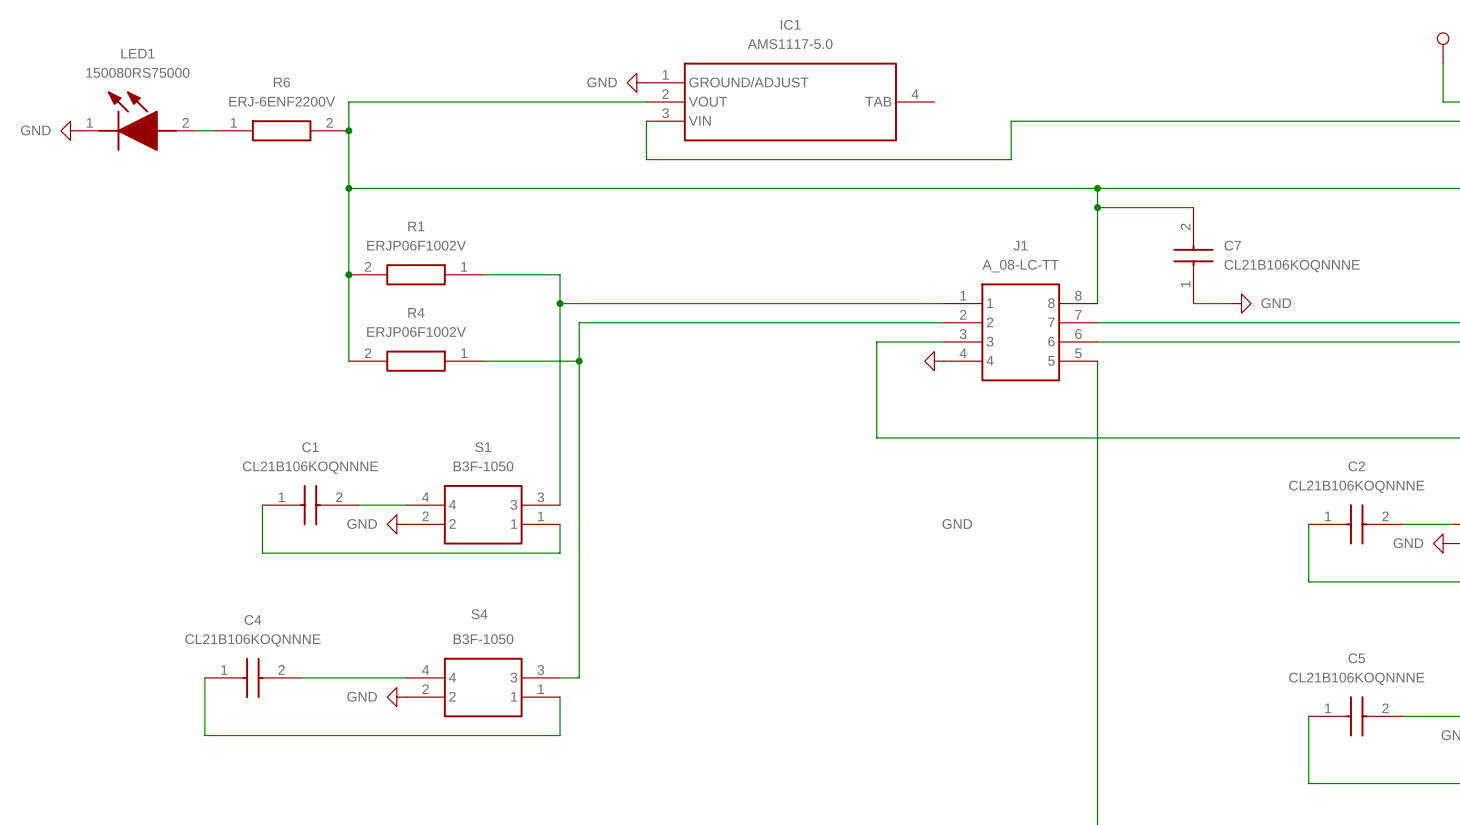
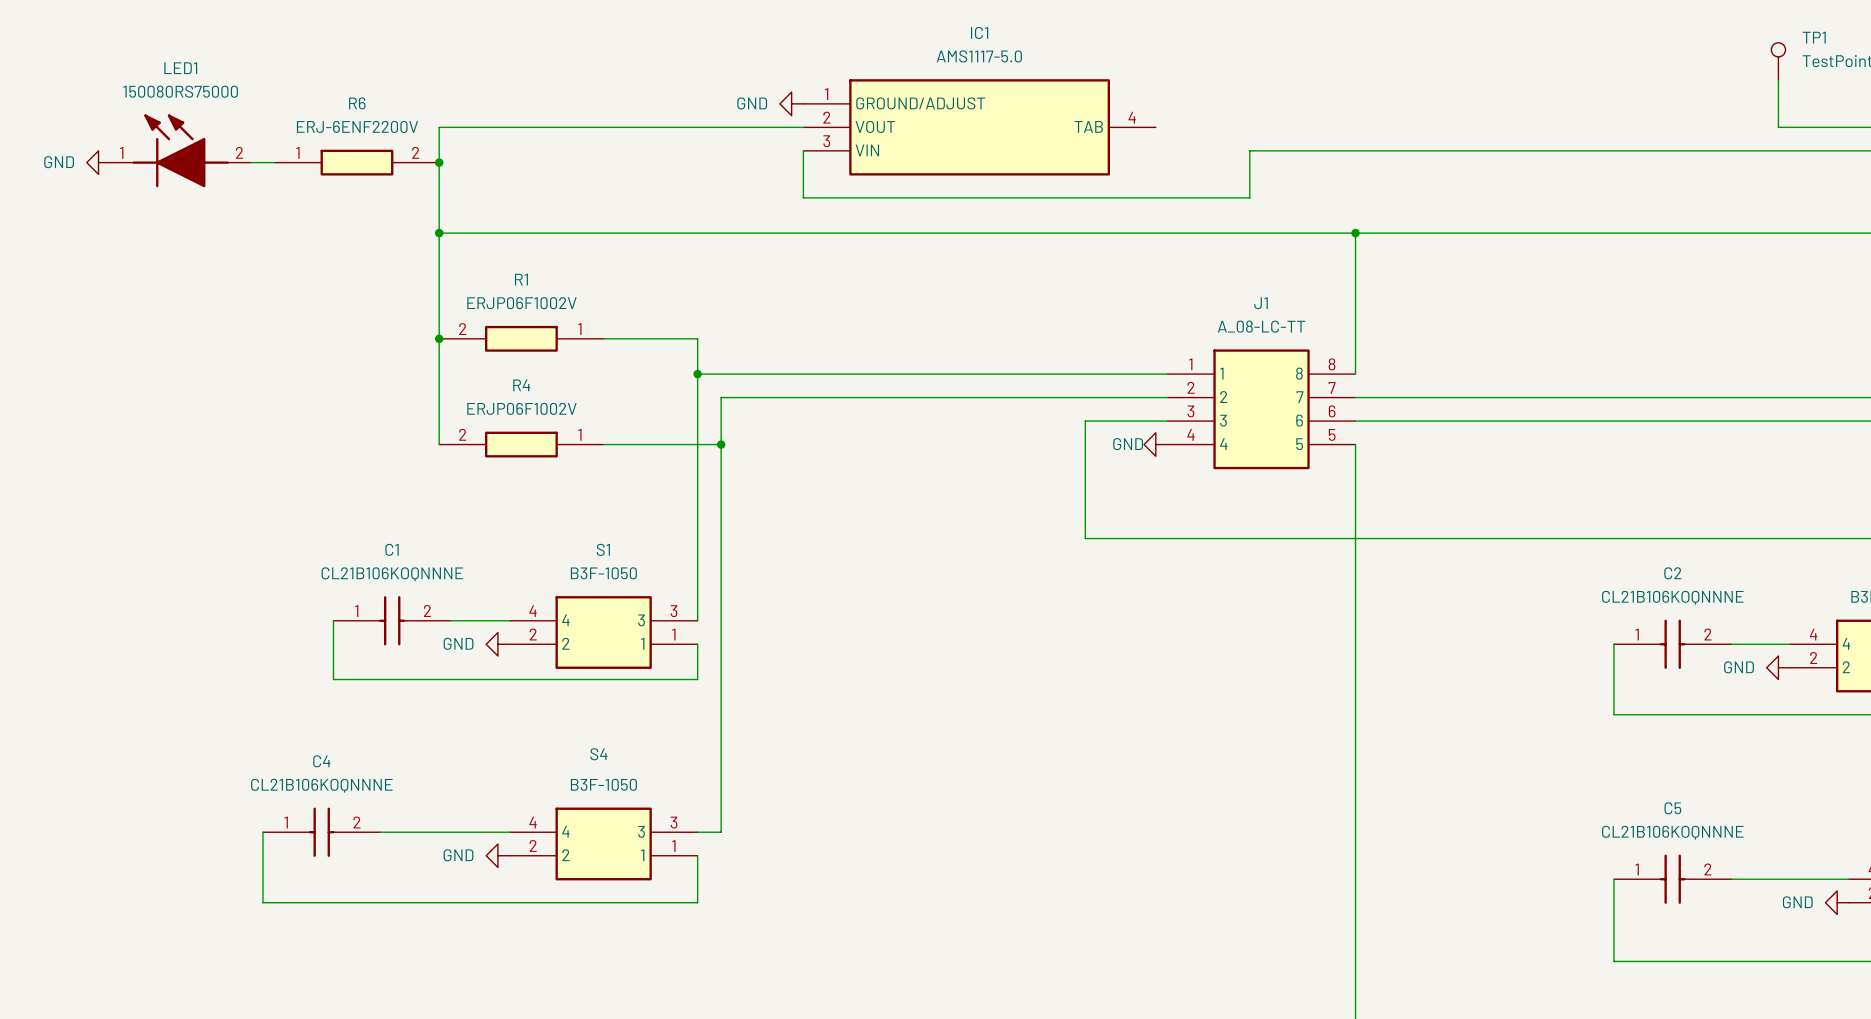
wire: (1097, 207) (1193, 207) -> none
junction: (1097, 207) -> none
C7: CL21B106KOQNNNE (1193, 255) -> none
wire: (1193, 303) (1231, 303) -> none
power symbol: GND (1241, 303) -> none
power symbol text position: GND (957, 523) -> GND (1128, 444)

